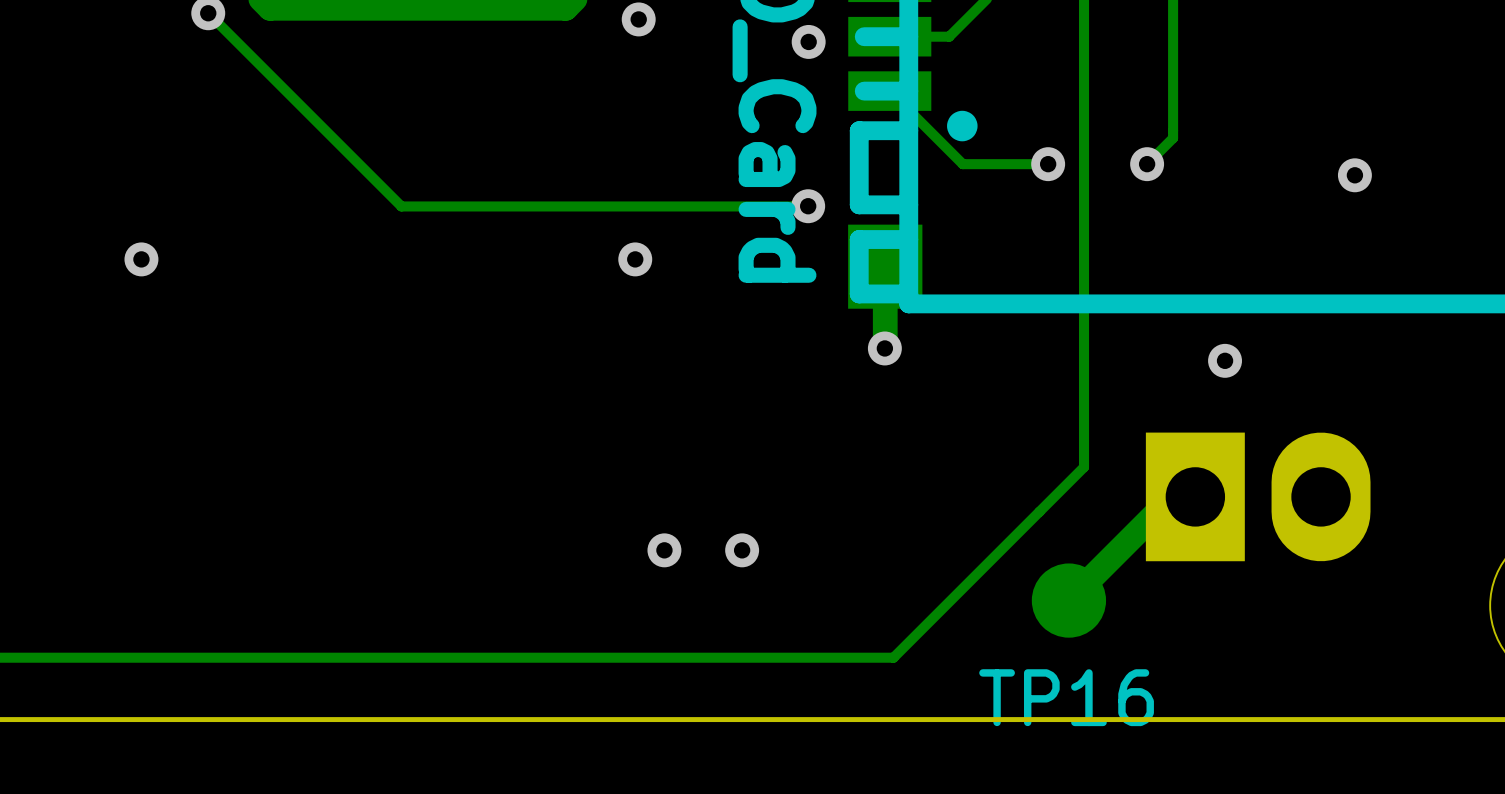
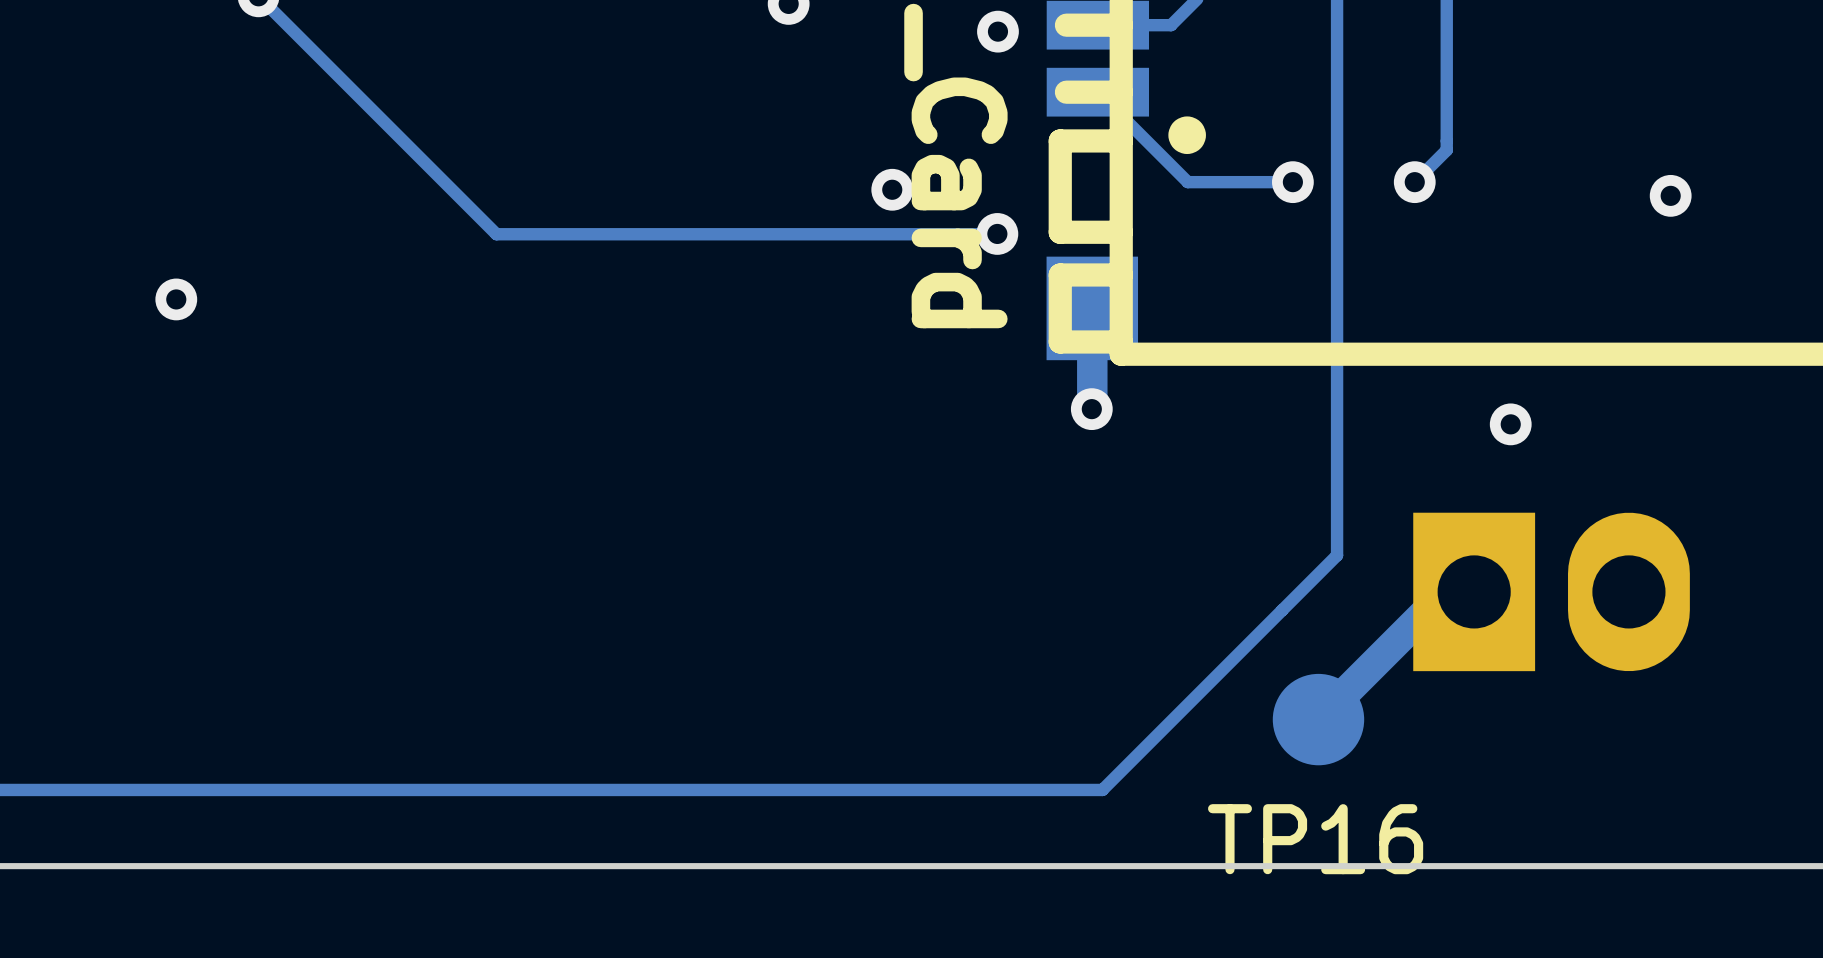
via position: (635, 259) -> (892, 189)
via: (664, 550) -> none
via: (742, 550) -> none

